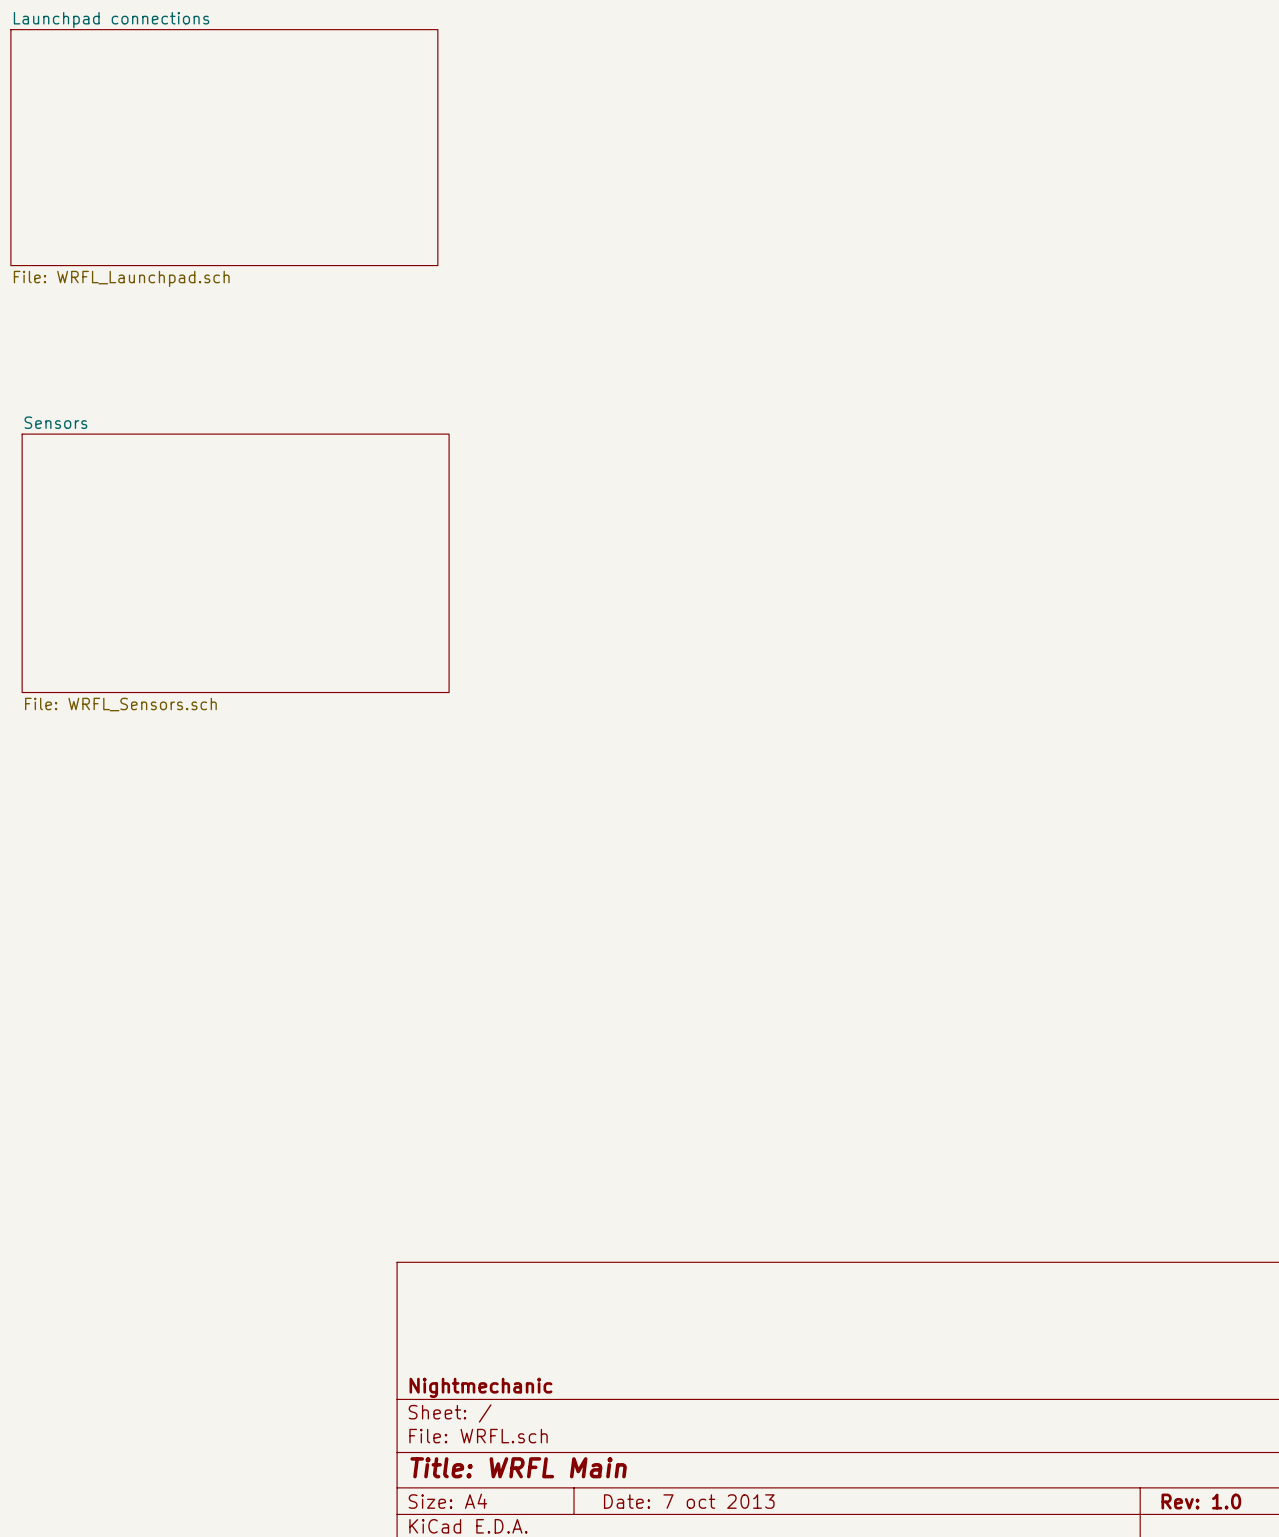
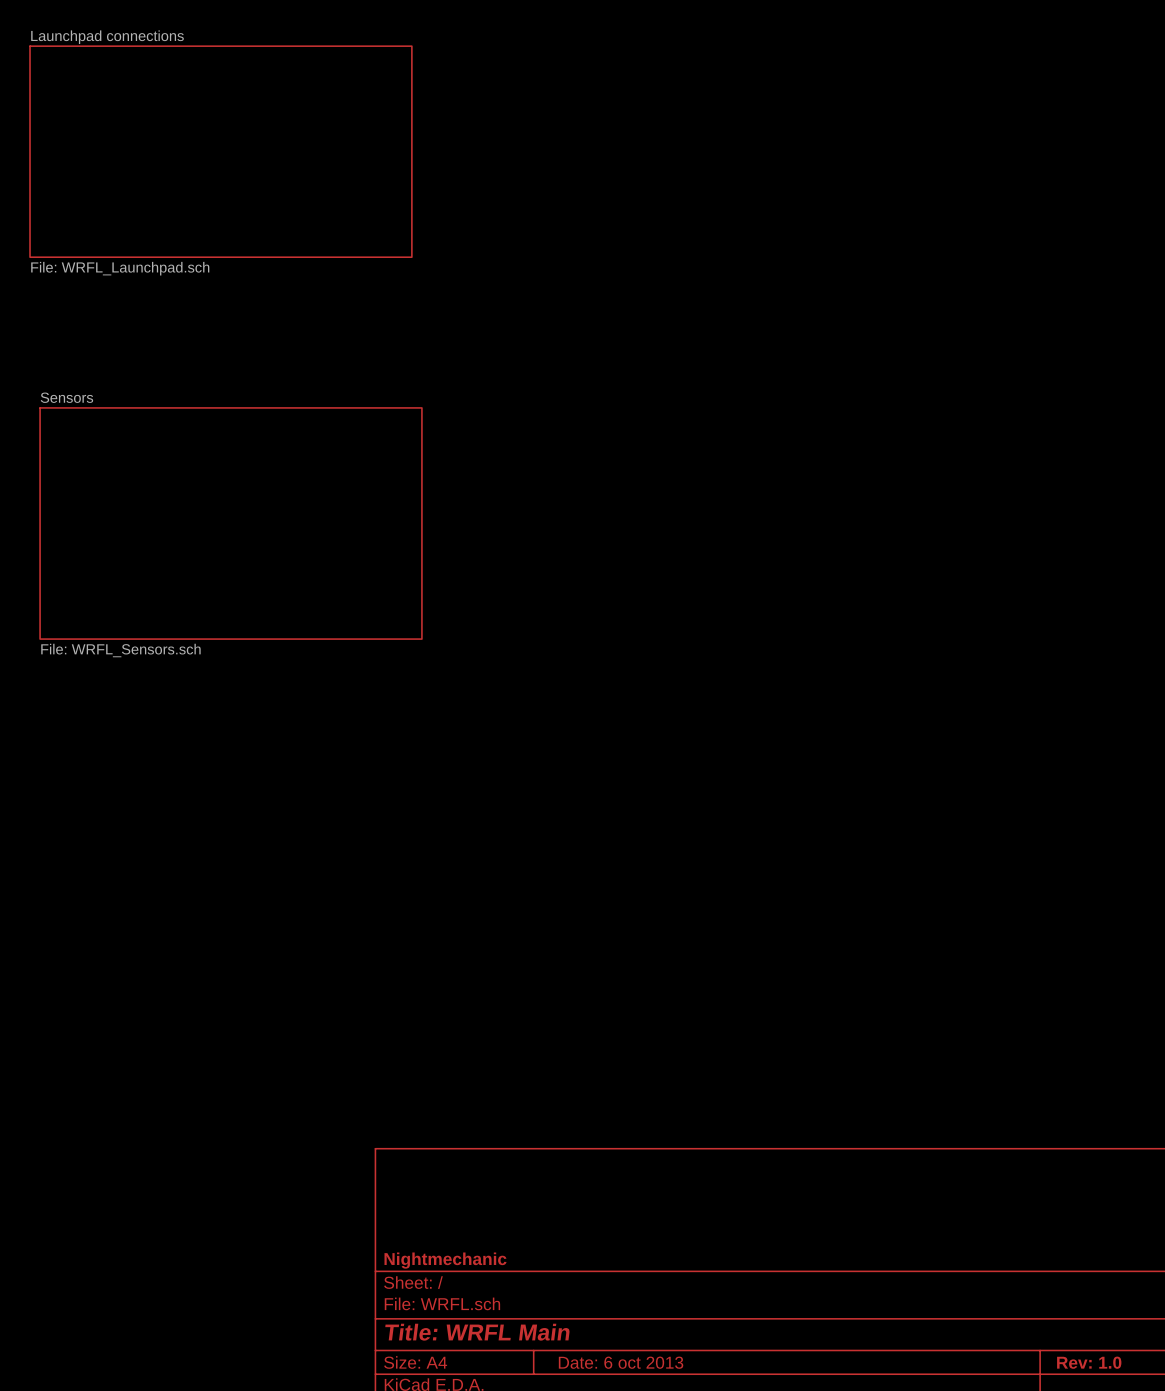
title block: Date: 7 oct 2013 (689, 1501) -> Date: 6 oct 2013 (621, 1362)

